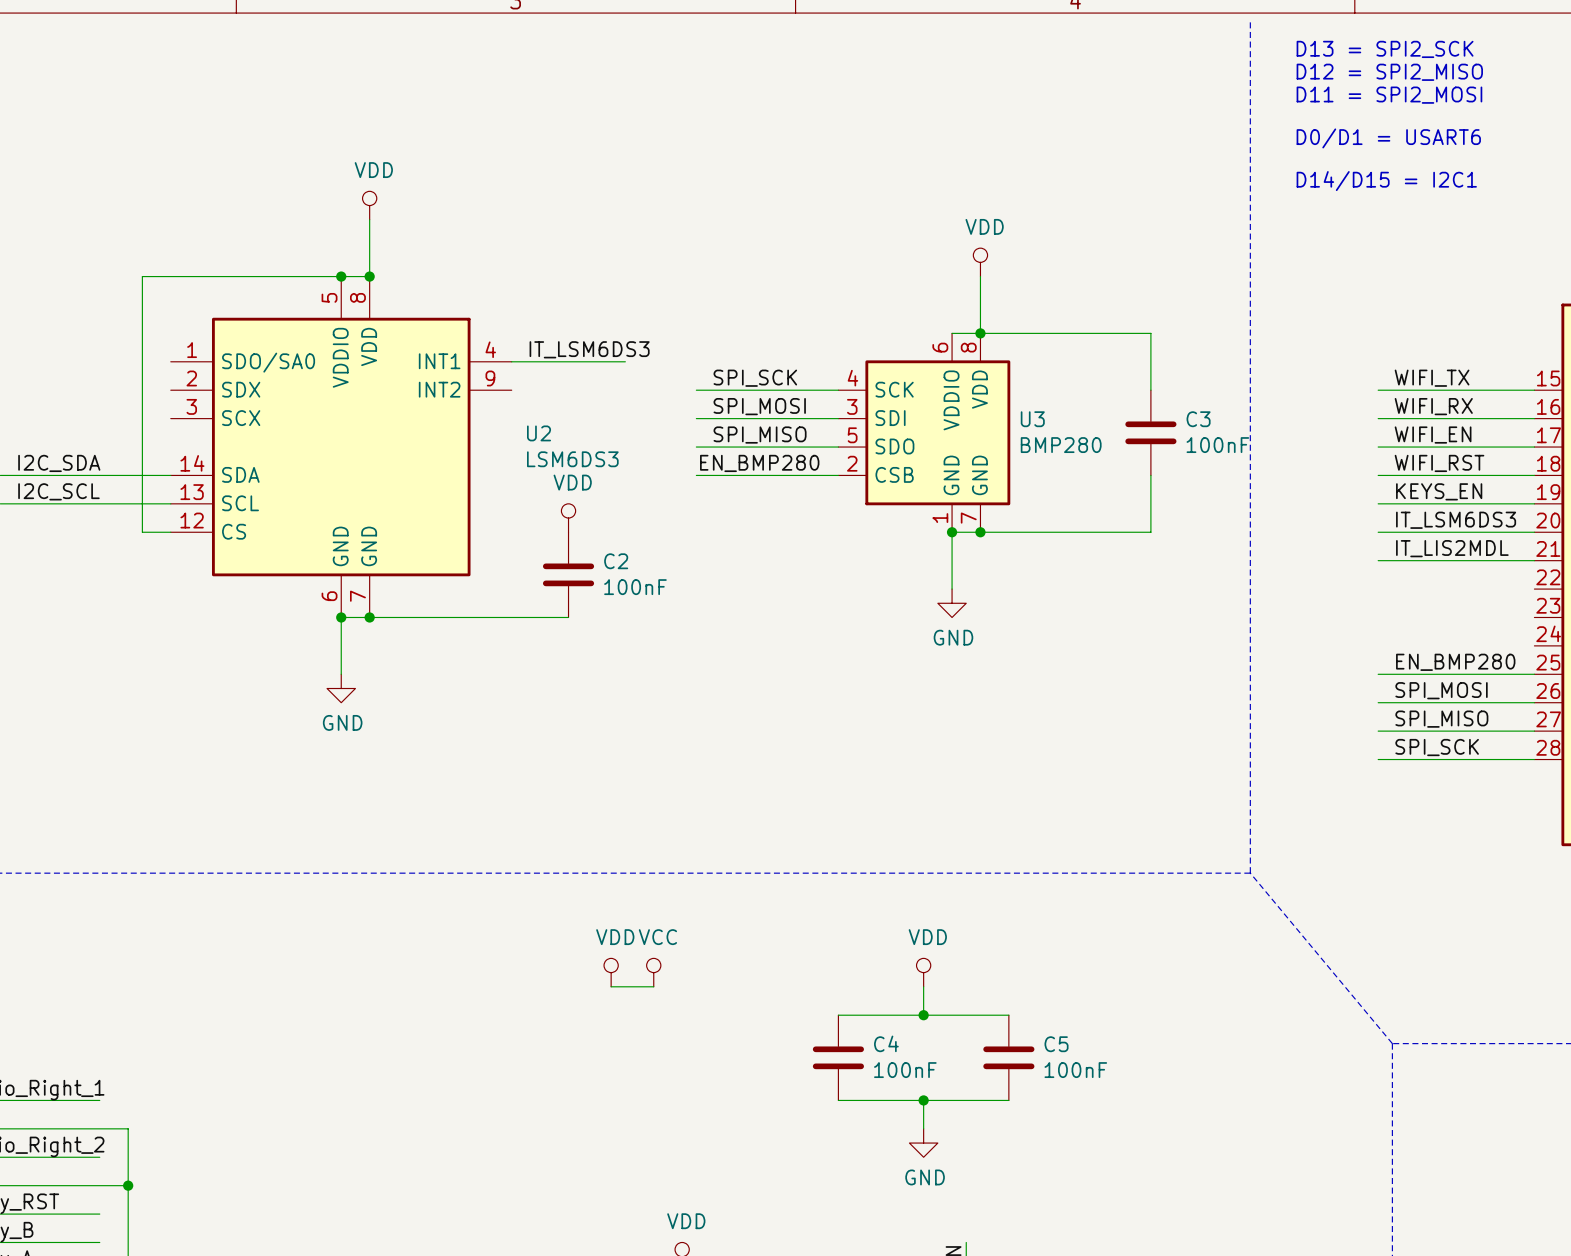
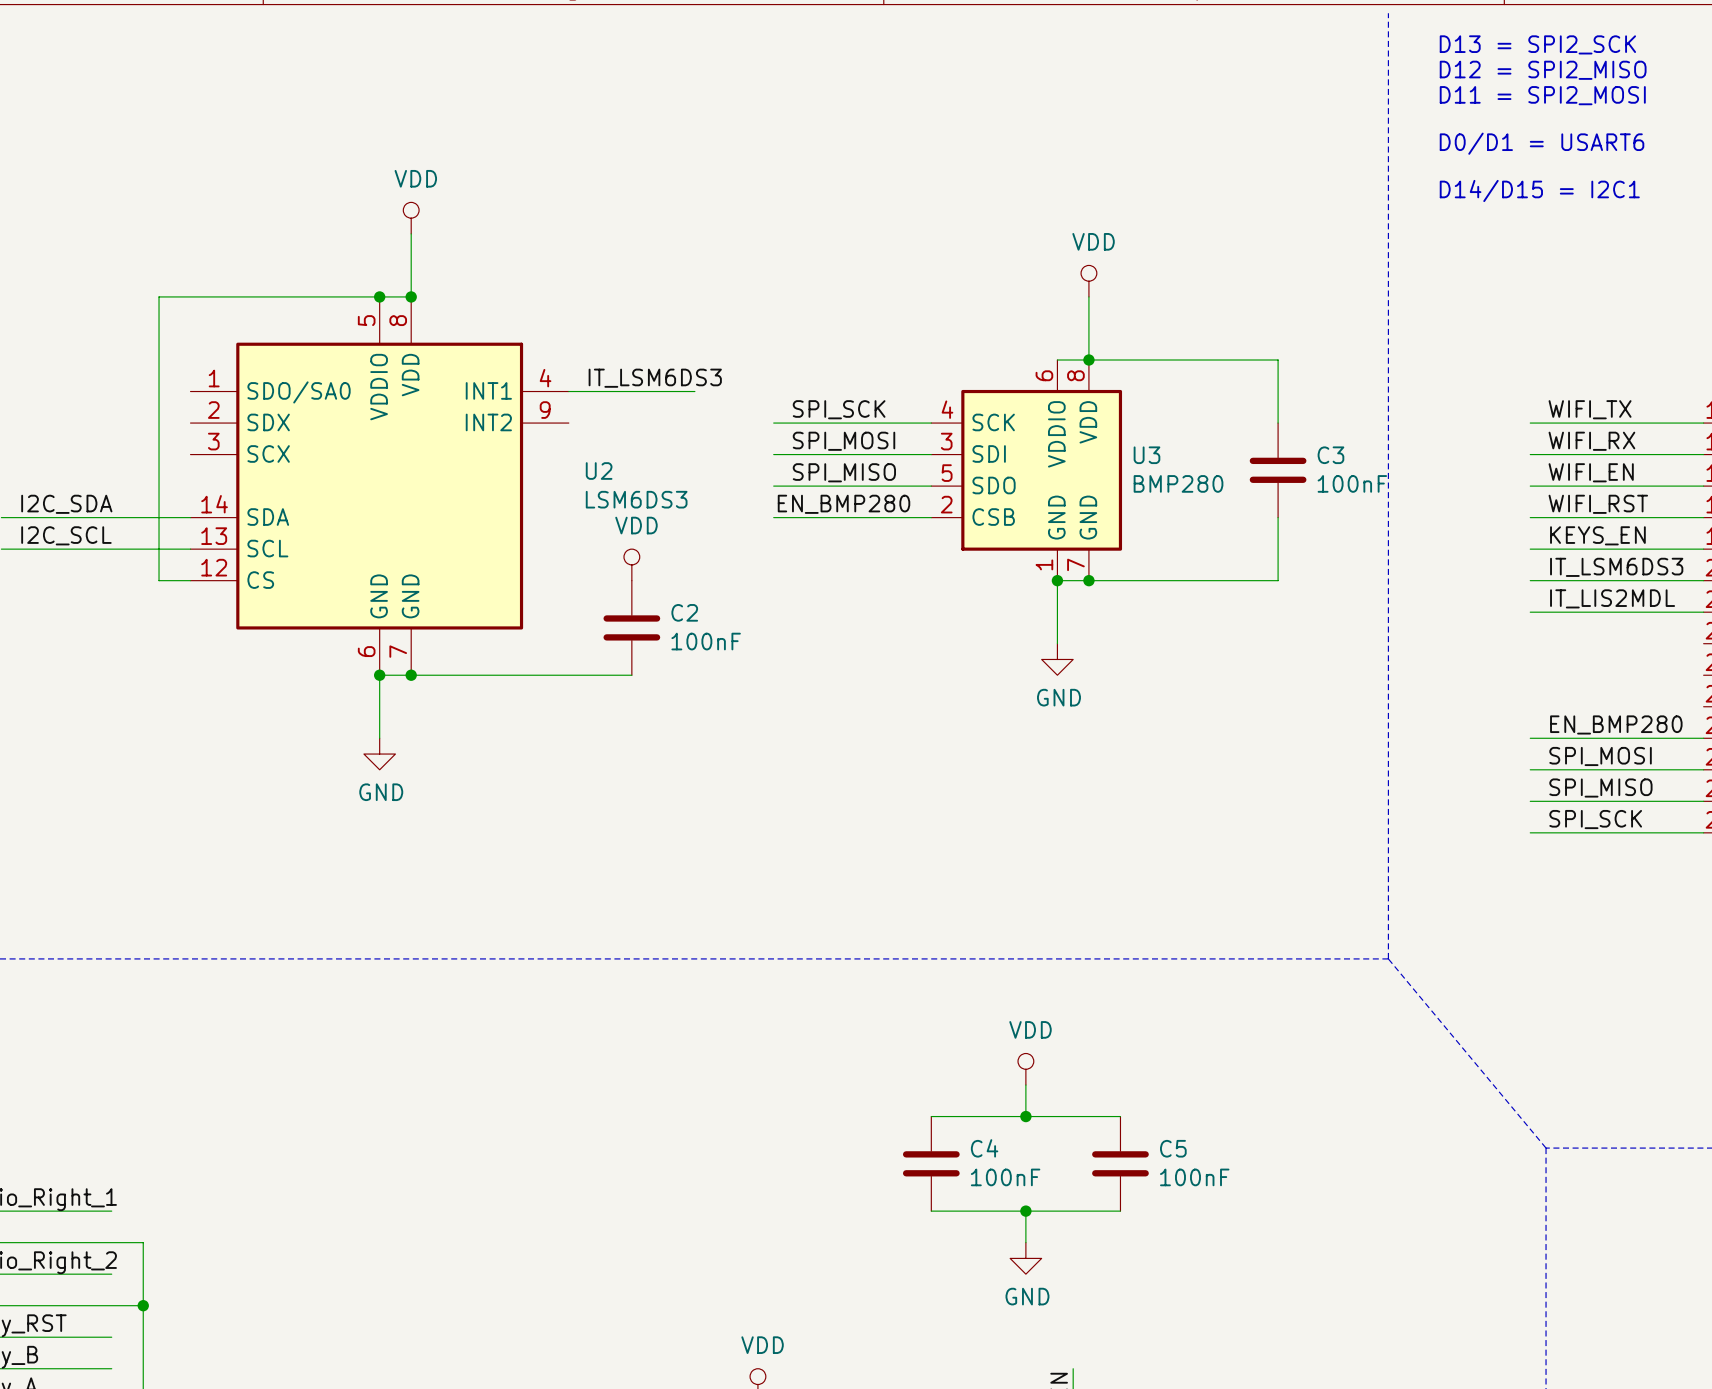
power symbol: VDD (611, 972) -> none
power symbol: VCC (653, 972) -> none
wire: (611, 986) (653, 986) -> none

